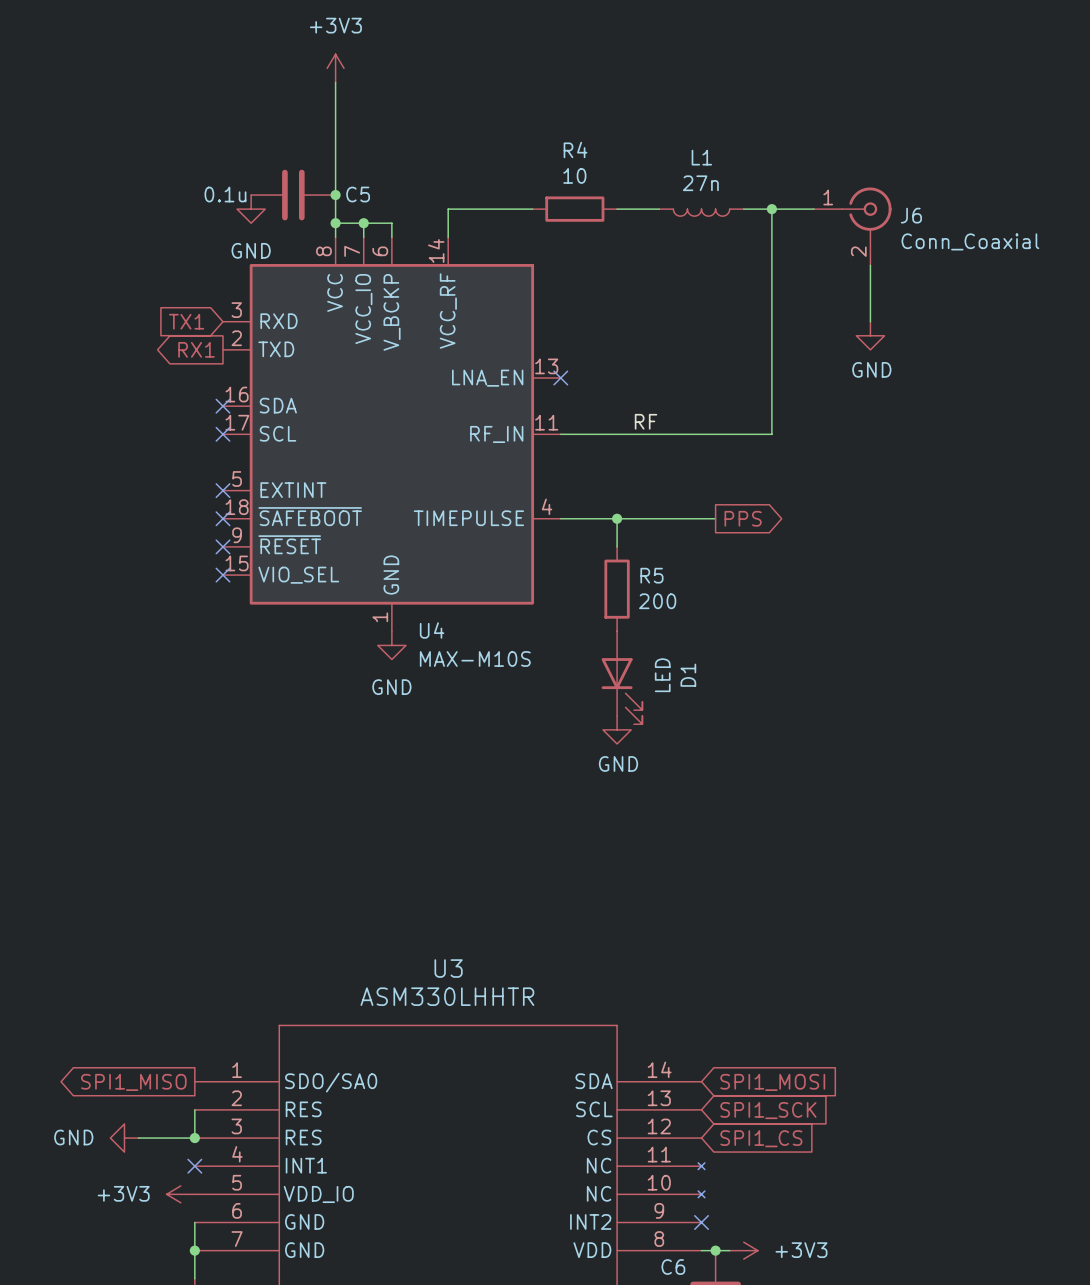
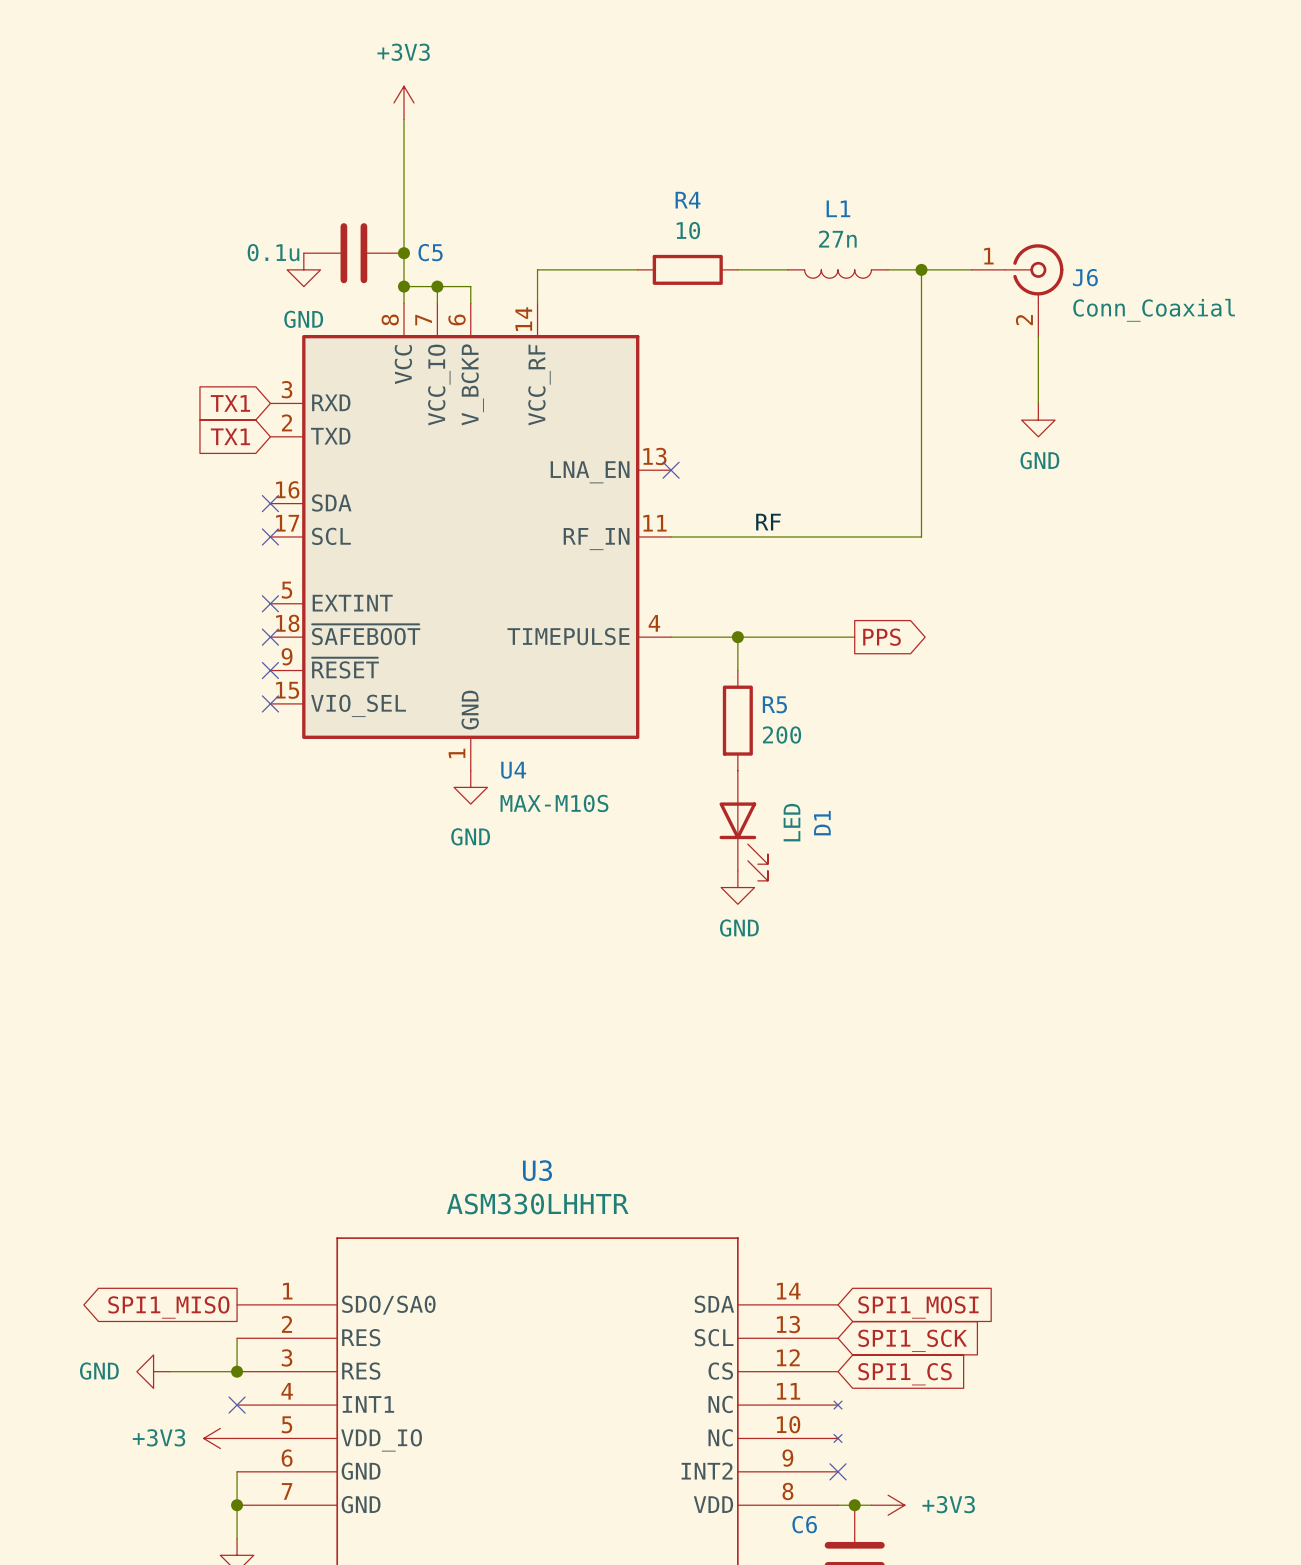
global label shape: output (196, 349) -> input (230, 436)
global label: RX1 (196, 349) -> TX1 (230, 436)

